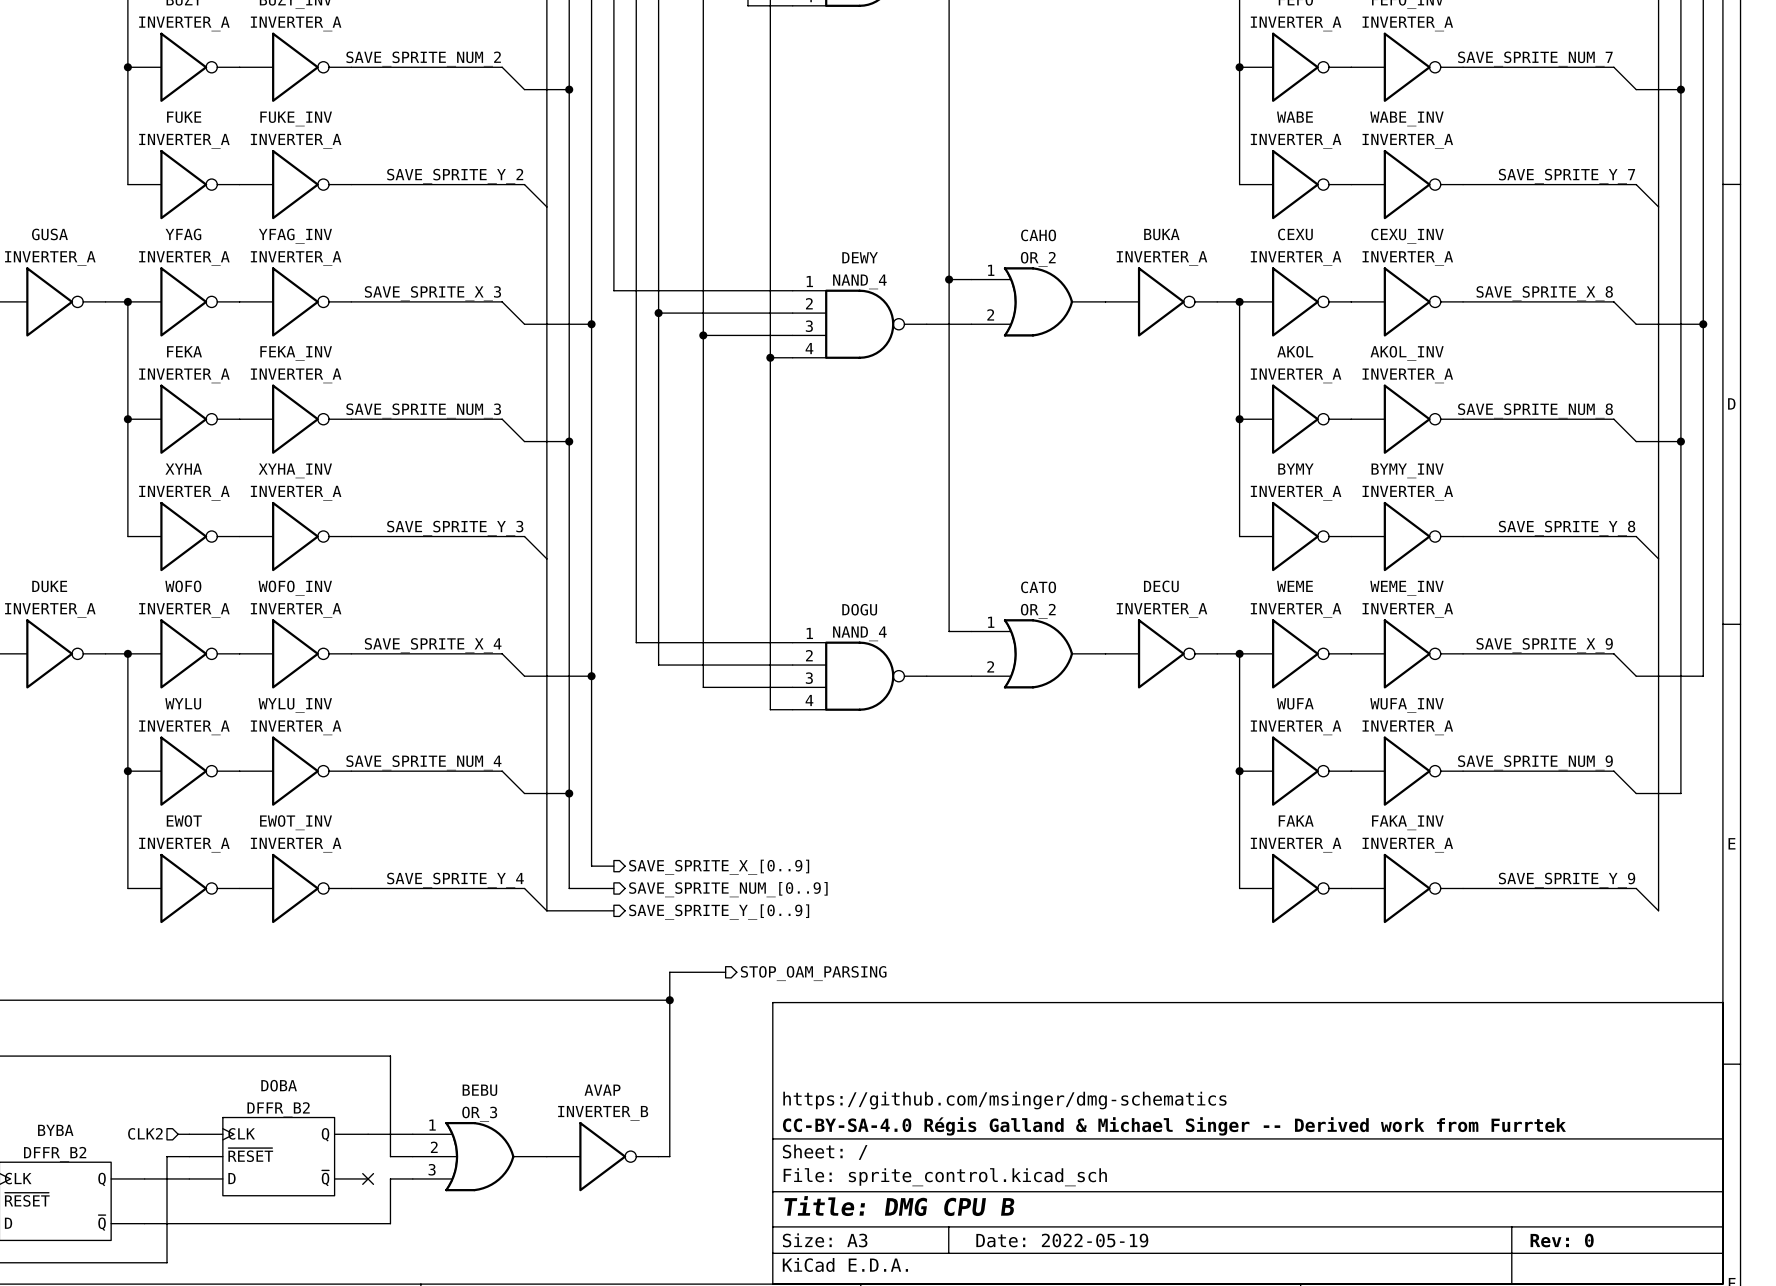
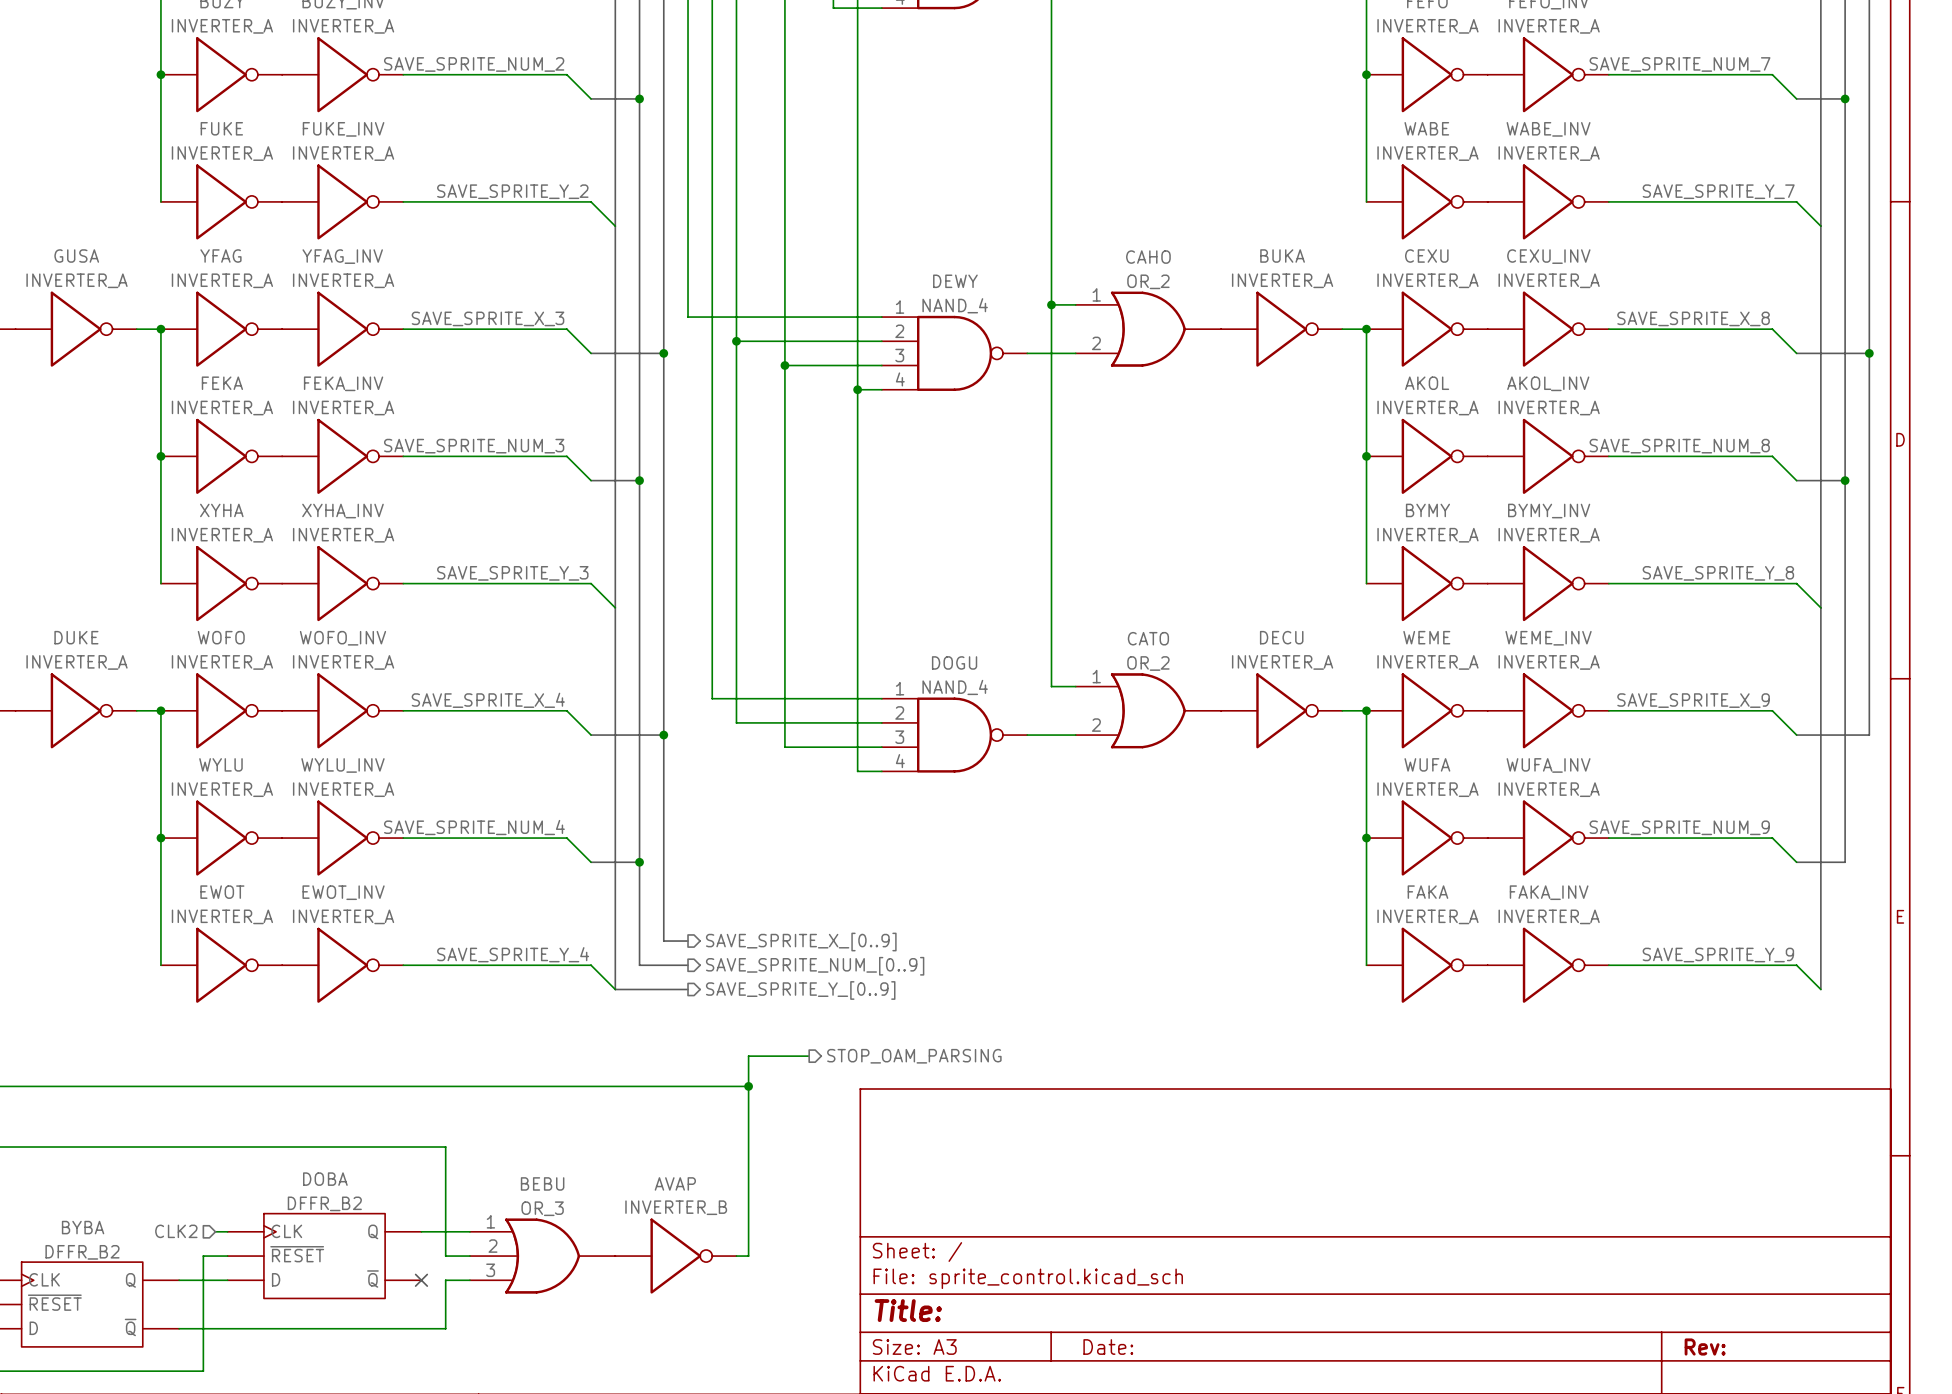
title block: https://github.com/msinger/dmg-schematics (1004, 1100) -> none
title block: CC-BY-SA-4.0 Régis Galland & Michael Singer -- Derived work from Furrtek (1174, 1126) -> none
title block: Title: DMG CPU B (899, 1206) -> Title: (908, 1310)
title block: Date: 2022-05-19 (1062, 1240) -> Date: (1108, 1347)
title block: Rev: 0 (1562, 1240) -> Rev: (1705, 1347)

